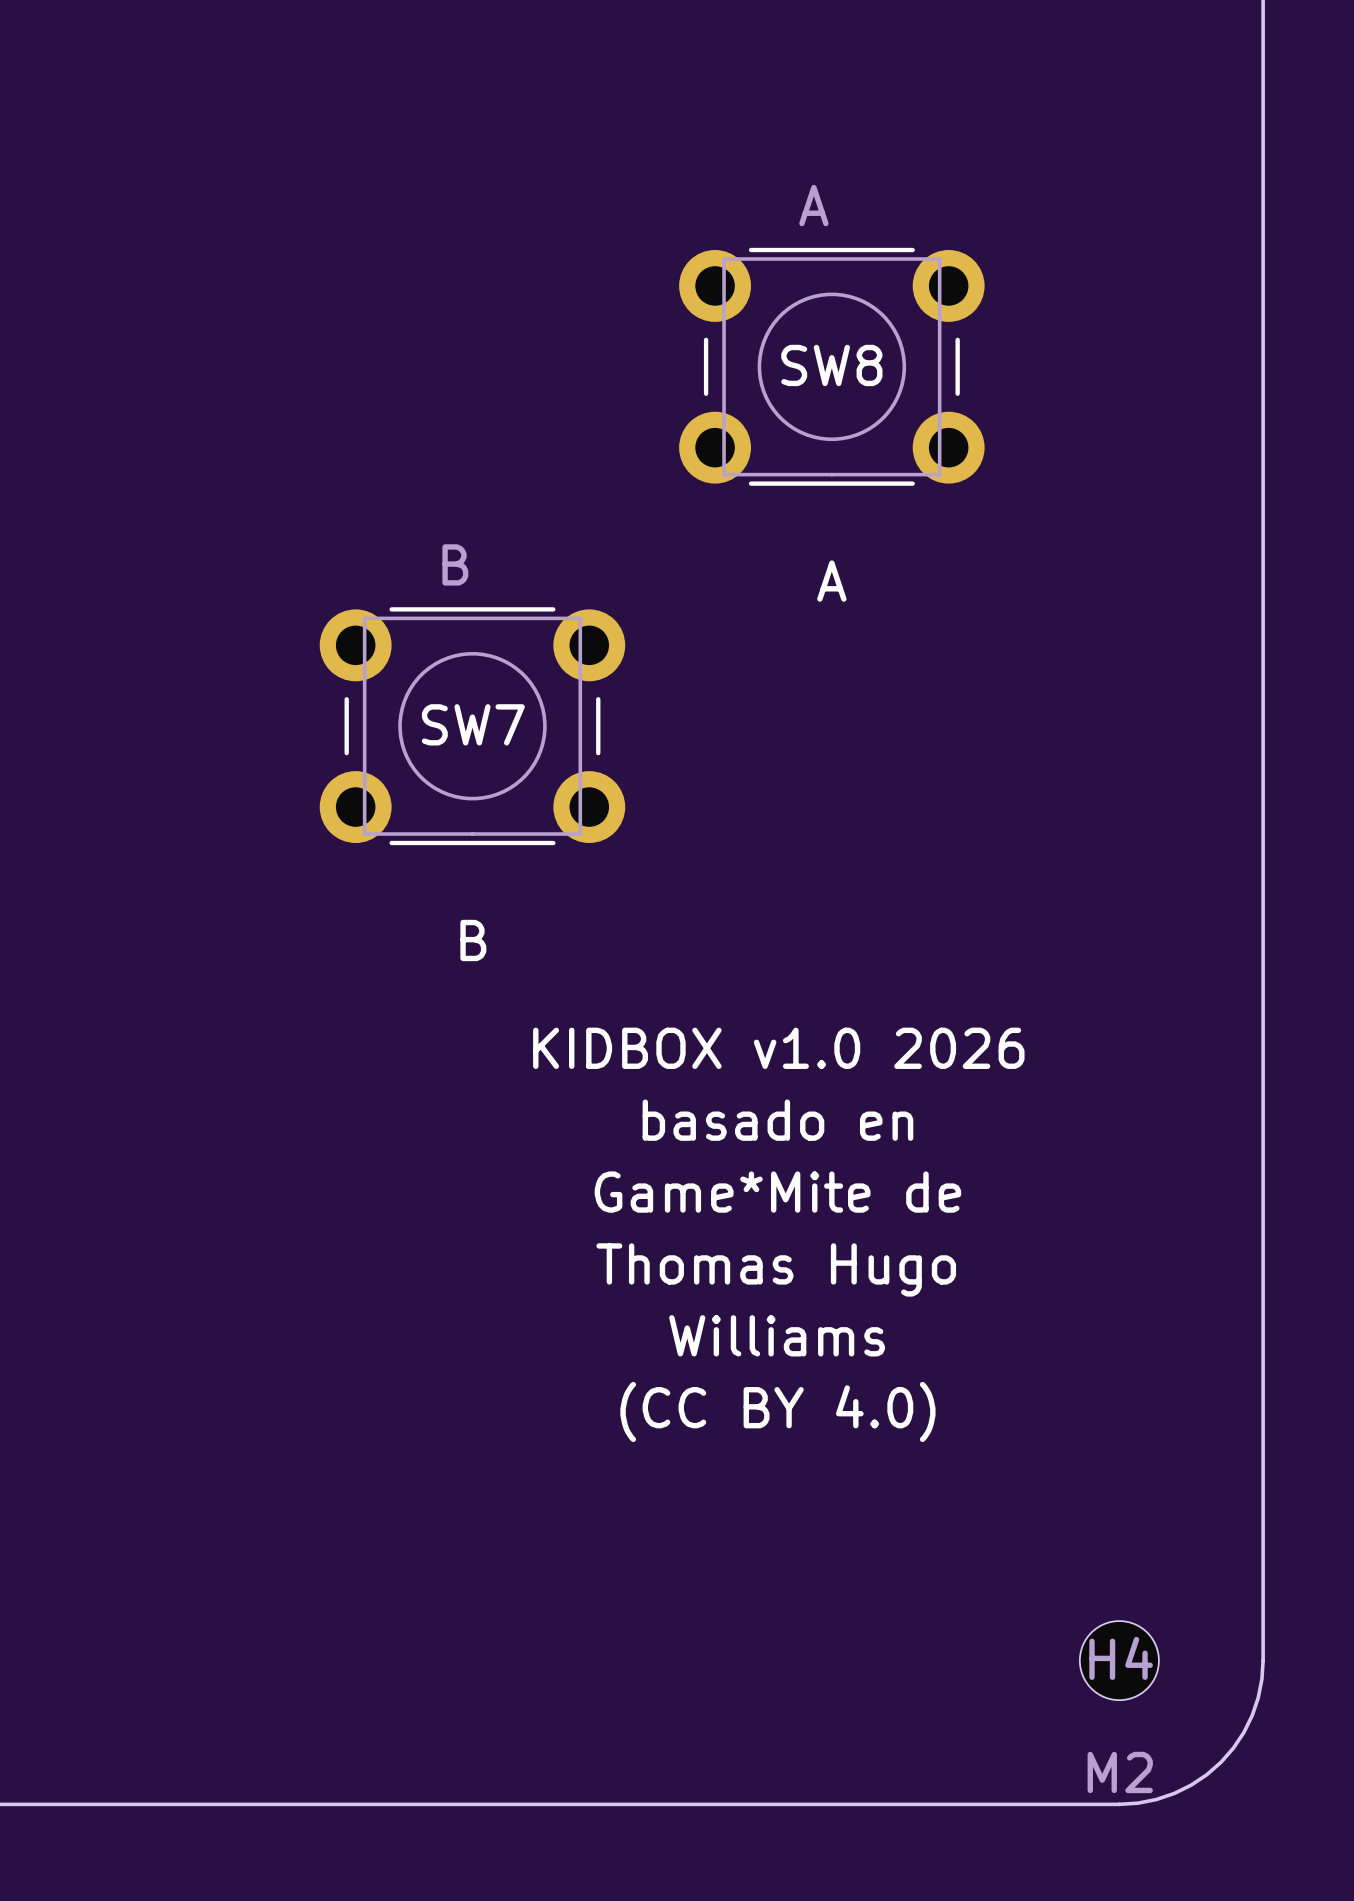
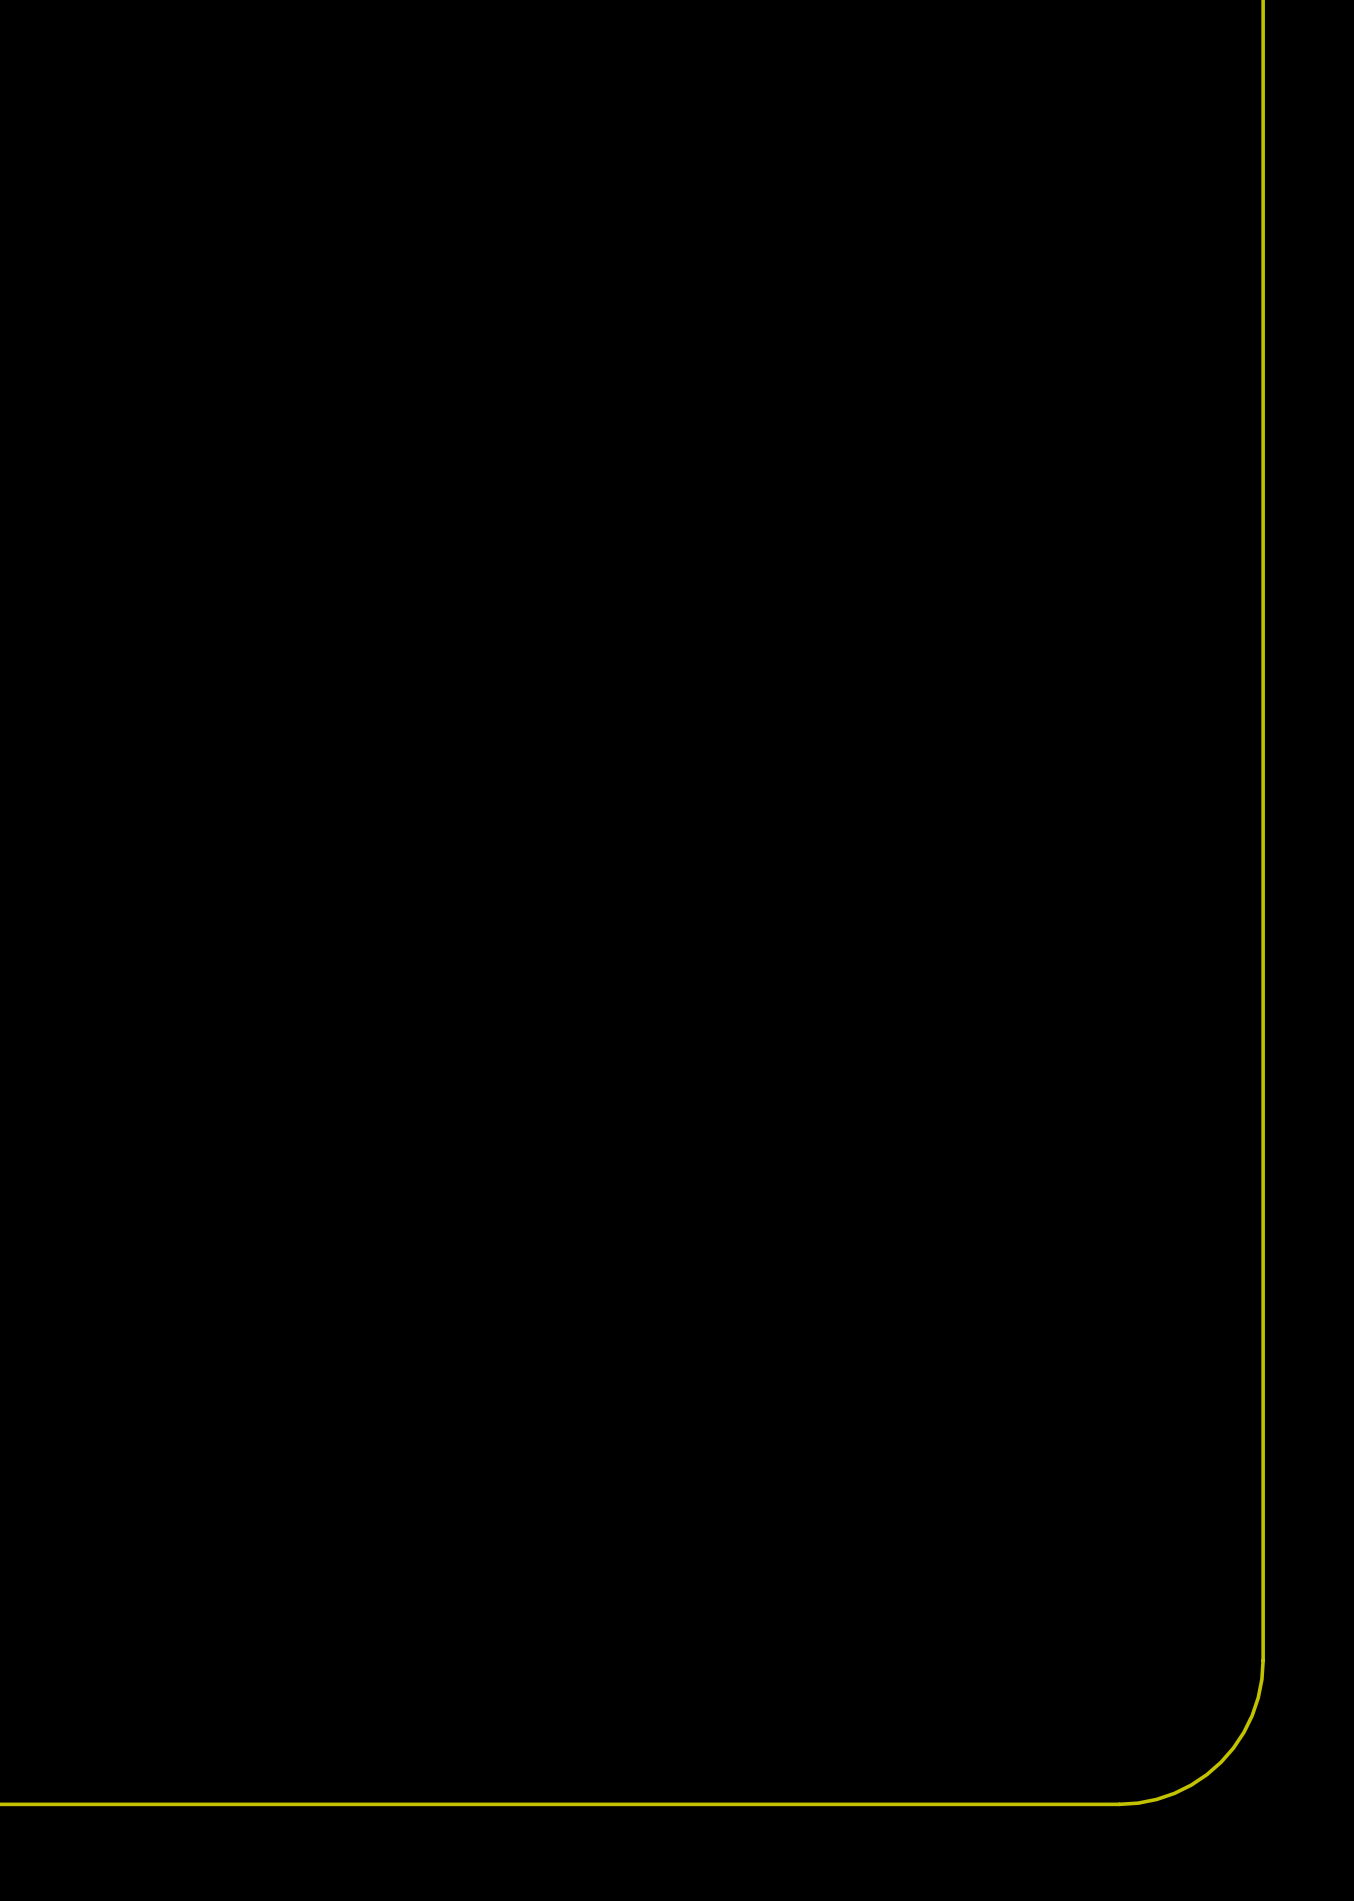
SW8: A (831, 366) -> none
text: A (831, 581) -> none
SW7: B (472, 726) -> none
text: B (473, 940) -> none
text: KIDBOX v1.0 2026 (778, 1048) -> none
text: basado en (777, 1120) -> none
text: Game*Mite de (777, 1192) -> none
text: Thomas Hugo (776, 1269) -> none
text: Williams (777, 1335) -> none
text: (CC BY 4.0) (777, 1411) -> none
H4: M2 (1119, 1660) -> none

